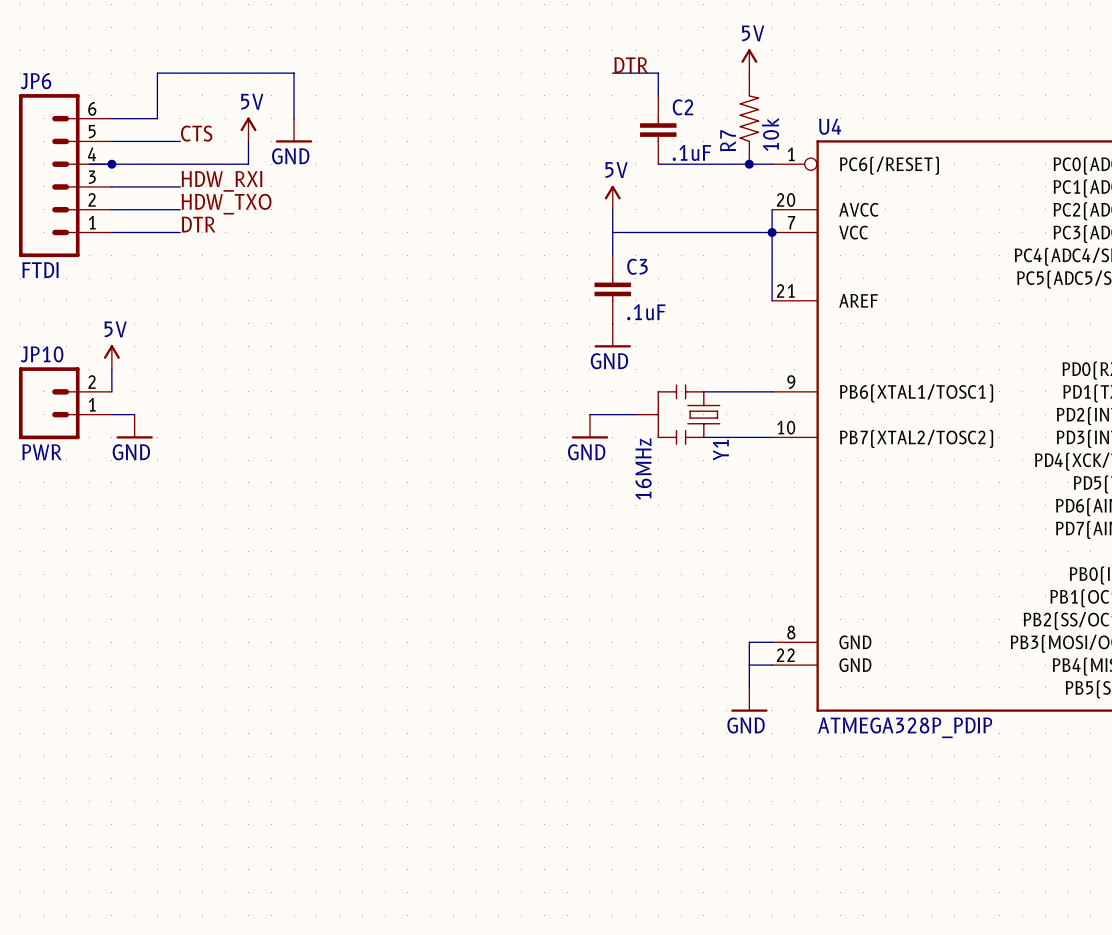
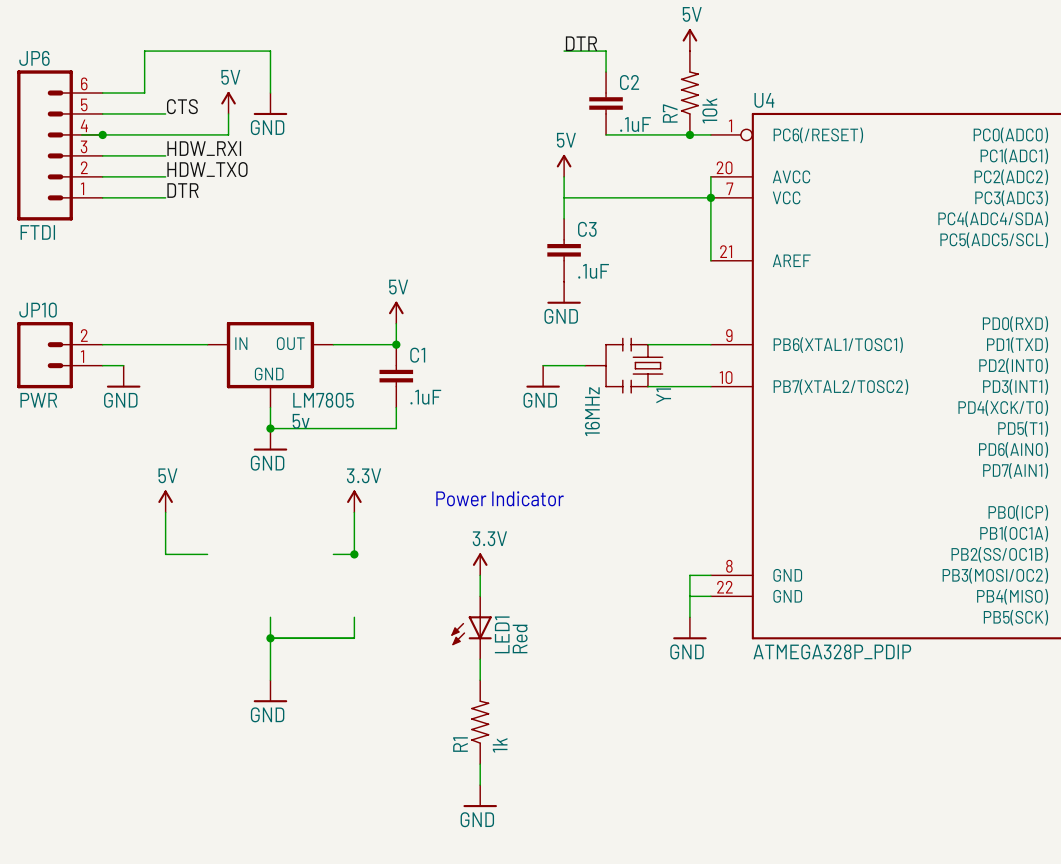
power symbol: 5V (111, 357) -> none
power symbol: none -> 5V (396, 312)
wire: (111, 369) (111, 391) -> (207, 344) (102, 344)
wire: none -> (396, 323) (396, 344) (333, 344)
junction: none -> (396, 344)
LM7805: none -> 5v (270, 364)
C1: none -> .1uF (396, 376)
wire: none -> (270, 407) (270, 428) (396, 428) (396, 407)
junction: none -> (270, 428)
power symbol: none -> GND (270, 439)
text: none -> Power Indicator (500, 498)
power symbol: none -> 5V (165, 501)
power symbol: none -> 3.3V (354, 501)
wire: none -> (165, 512) (165, 554) (207, 554)
wire: none -> (354, 512) (354, 554) (333, 554)
junction: none -> (354, 554)
power symbol: none -> 3.3V (480, 564)
wire: none -> (480, 575) (480, 596)
wire: none -> (270, 617) (270, 680)
wire: none -> (354, 617) (354, 638) (270, 638)
LED1: none -> Red (471, 627)
junction: none -> (270, 638)
wire: none -> (480, 659) (480, 680)
power symbol: none -> GND (270, 691)
R1: none -> 1k (480, 722)
wire: none -> (480, 764) (480, 785)
power symbol: none -> GND (480, 796)

